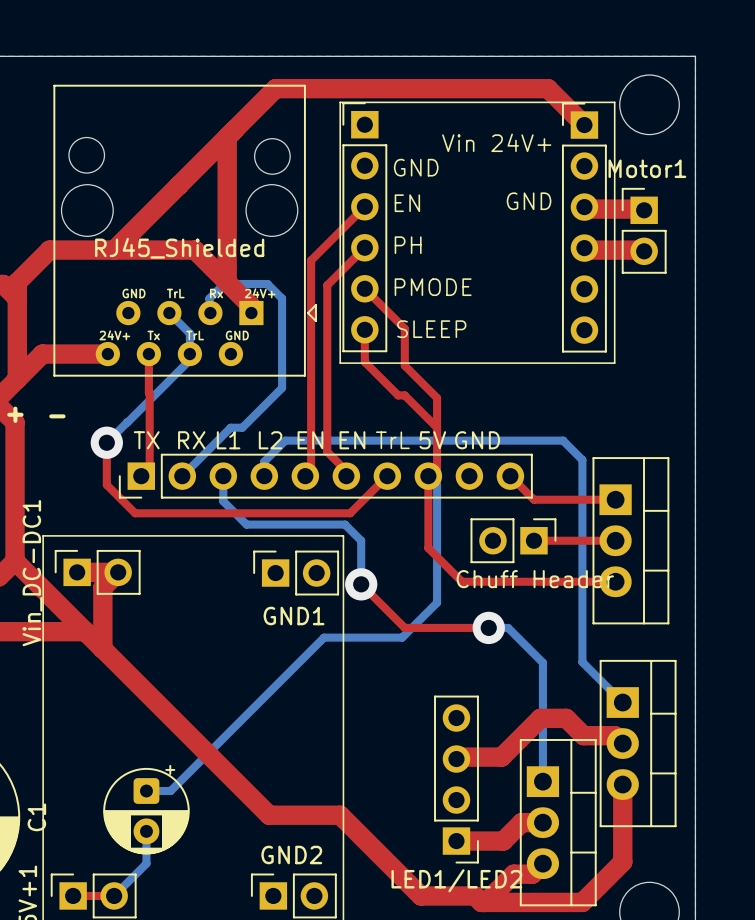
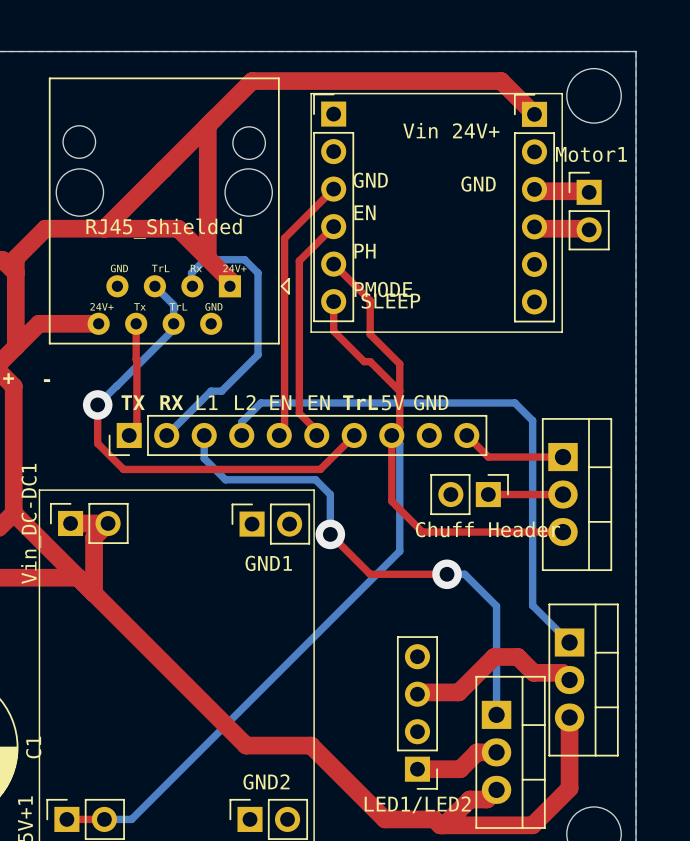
text position: GND (416, 167) -> GND (370, 180)
text position: EN (407, 203) -> EN (365, 212)
text position: PH (408, 245) -> PH (365, 251)
text position: PMODE (433, 287) -> PMODE (383, 289)
bottom track: (402, 637) (324, 637) (170, 791) (146, 791) -> (367, 583) (131, 819) (103, 819)
part: (146, 809) -> none
bottom track: (146, 831) (146, 863) (114, 895) -> none

